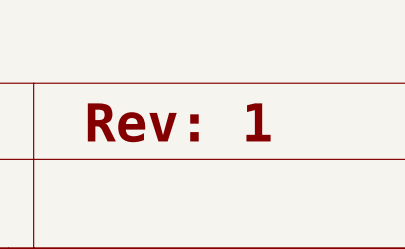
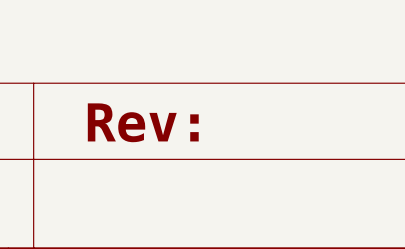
title block: Rev: 1 (179, 122) -> Rev: (143, 122)

